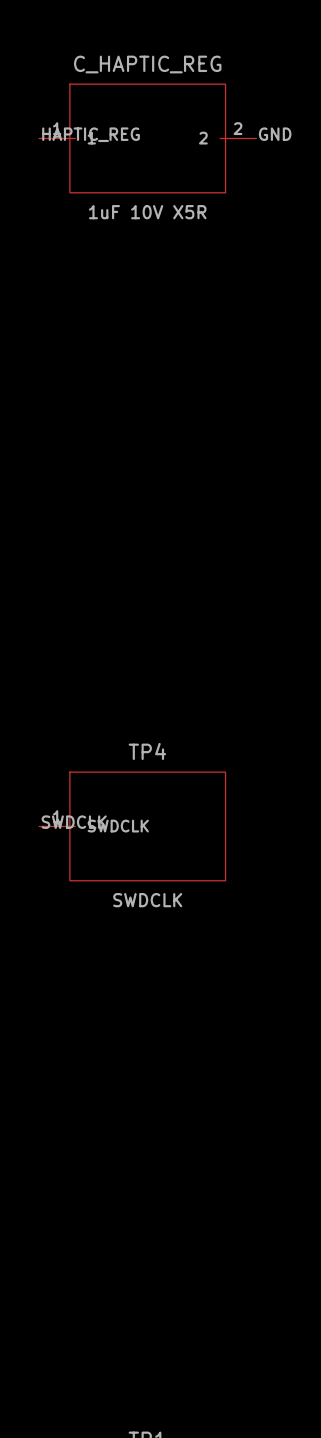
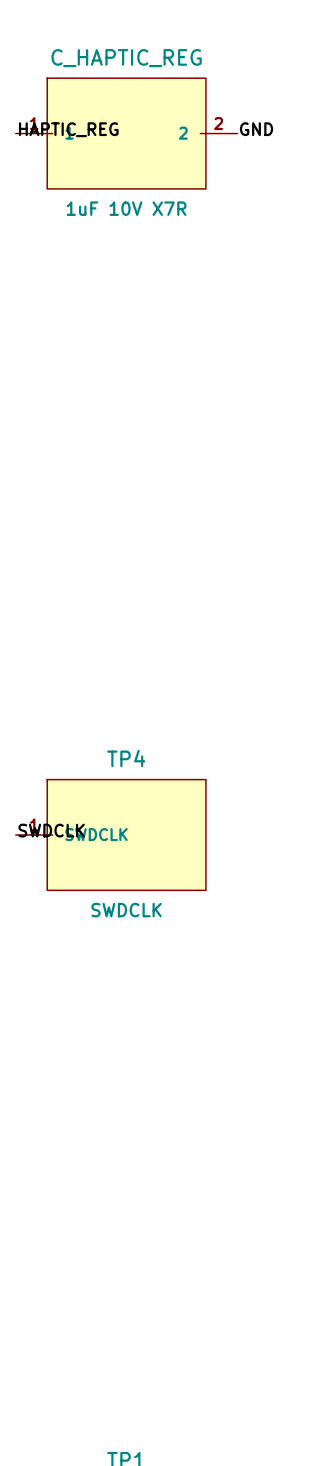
C_HAPTIC_REG value: 1uF 10V X5R (147, 212) -> 1uF 10V X7R (126, 208)

